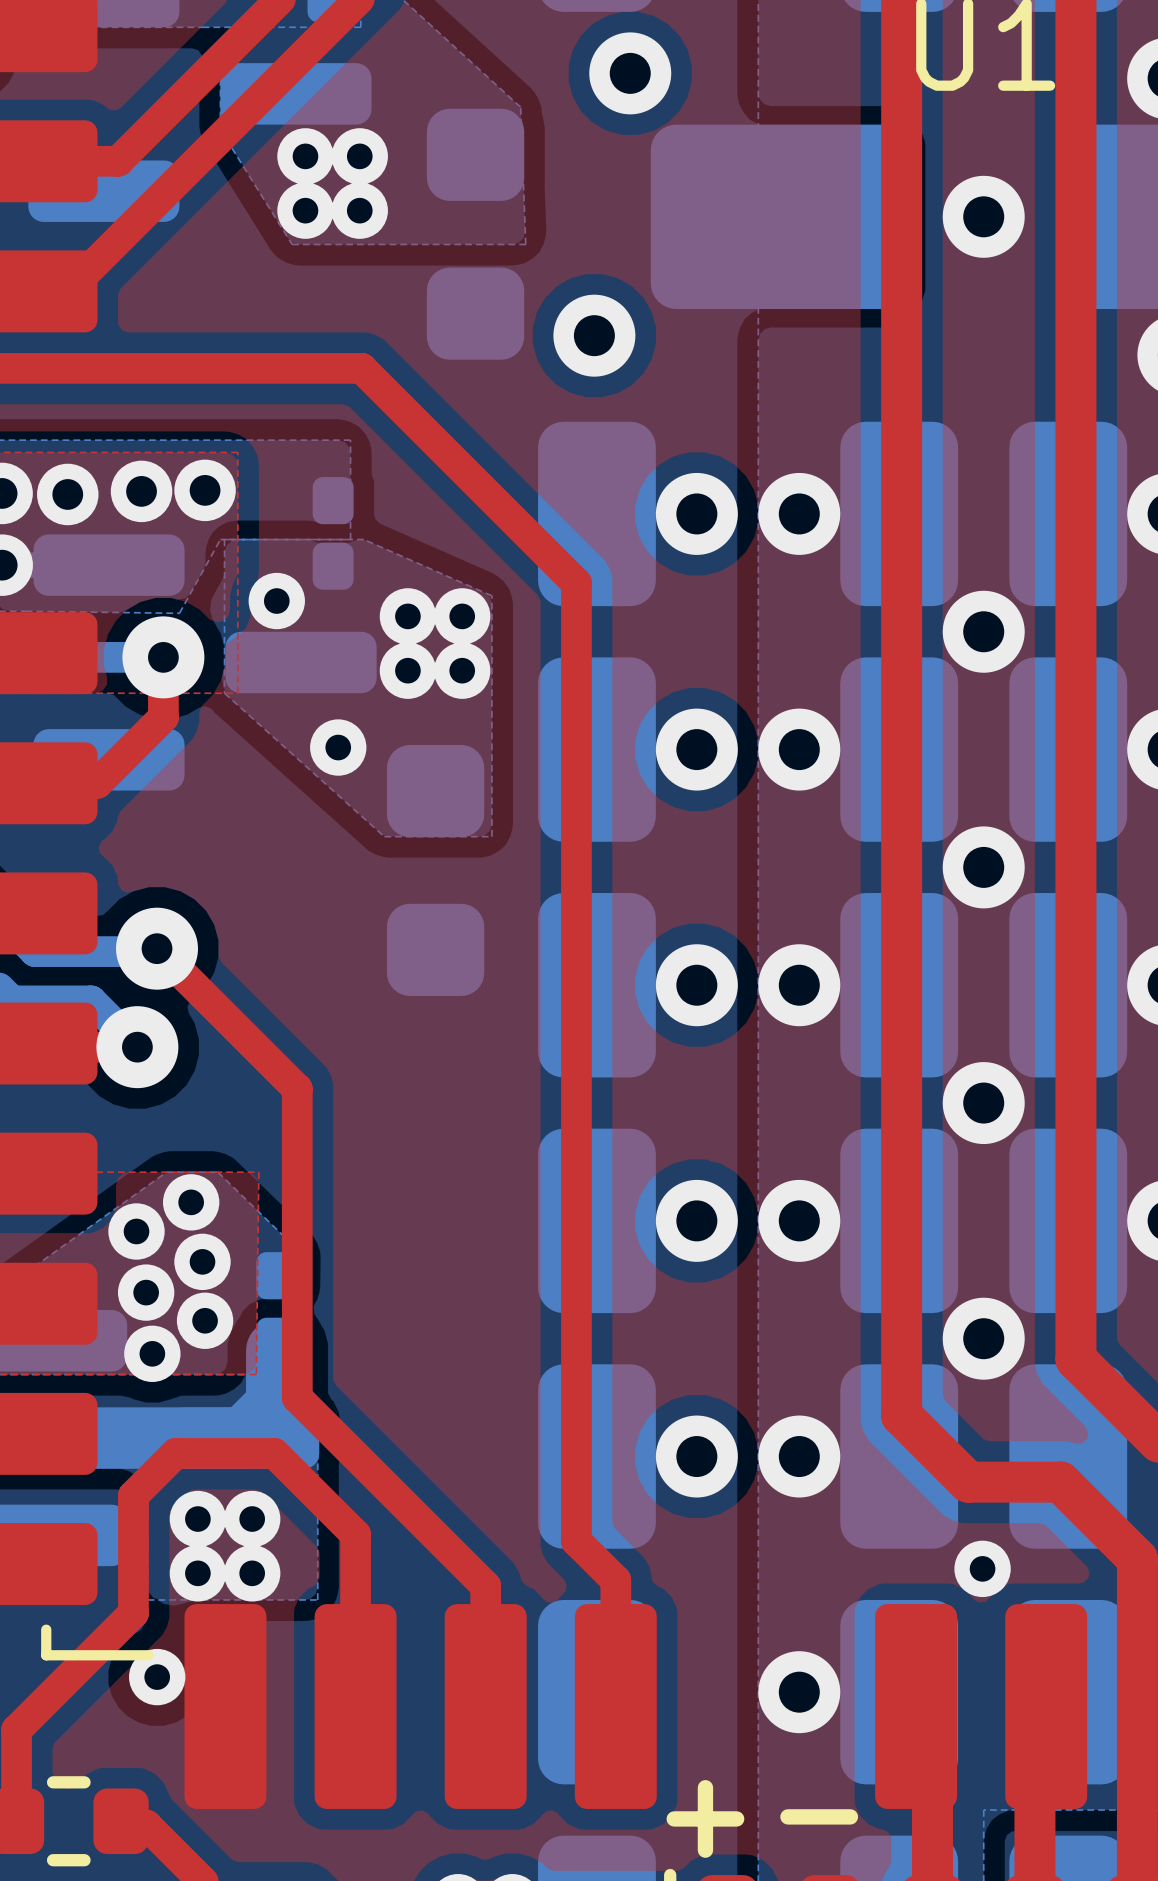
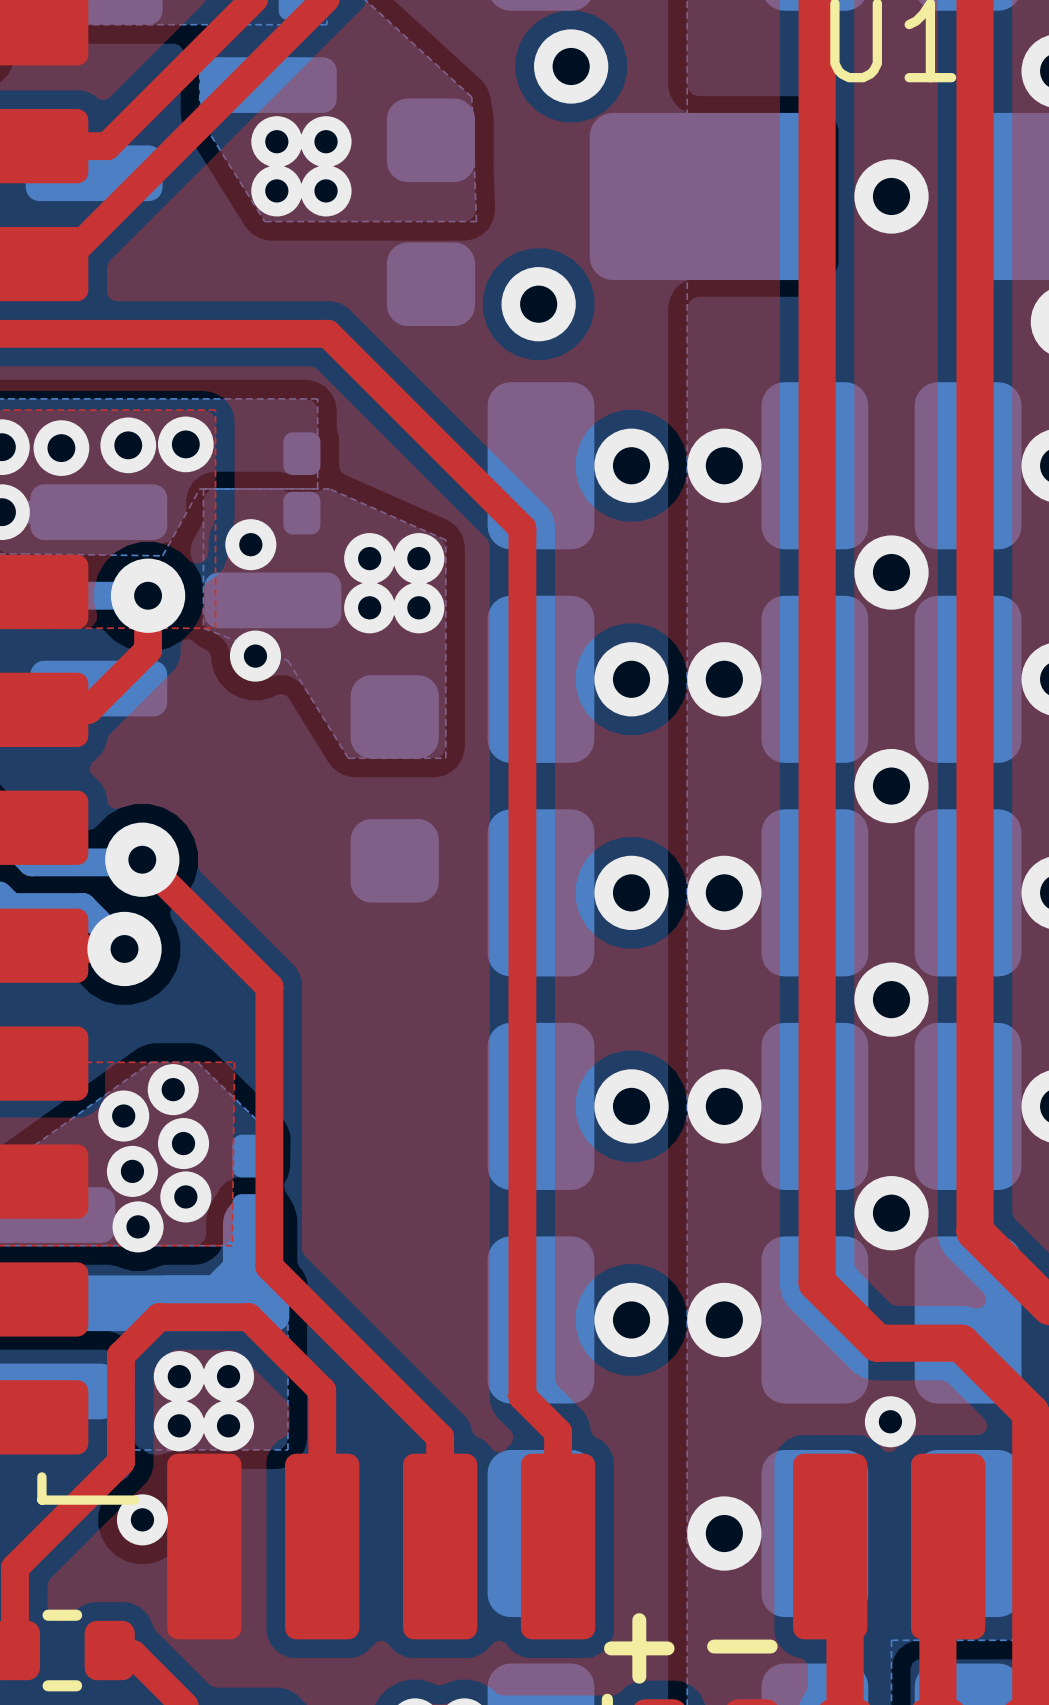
bottom zone outline: (224, 693) (384, 836) -> (203, 628) (287, 660) (348, 758)
via position: (338, 747) -> (255, 656)

